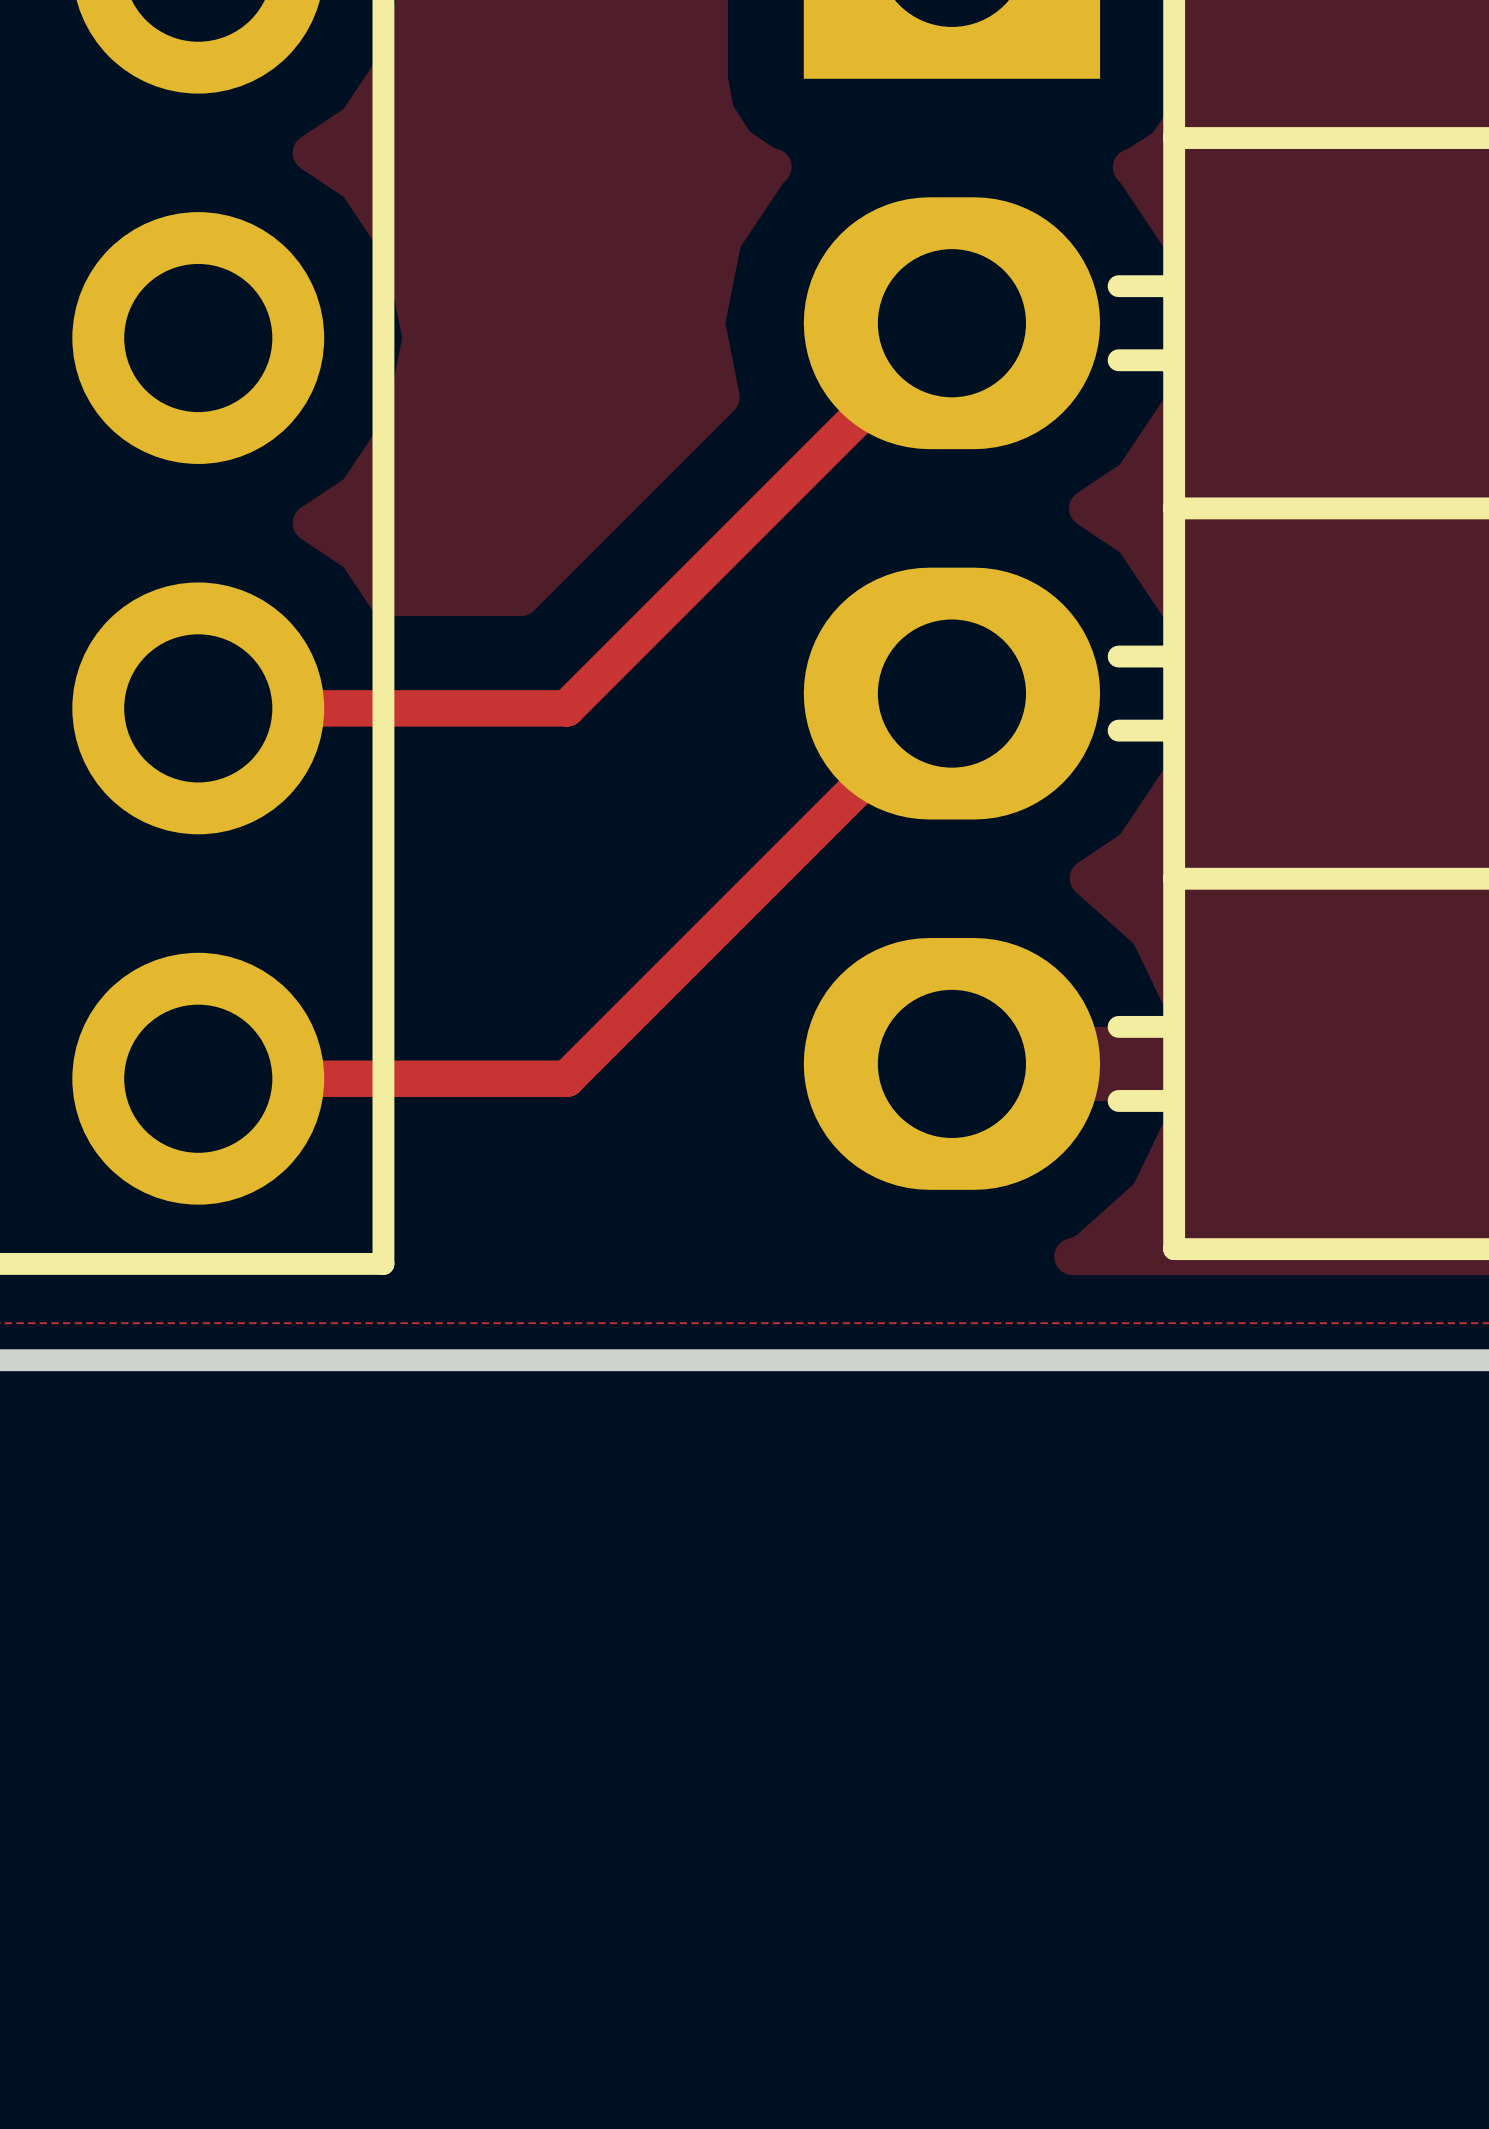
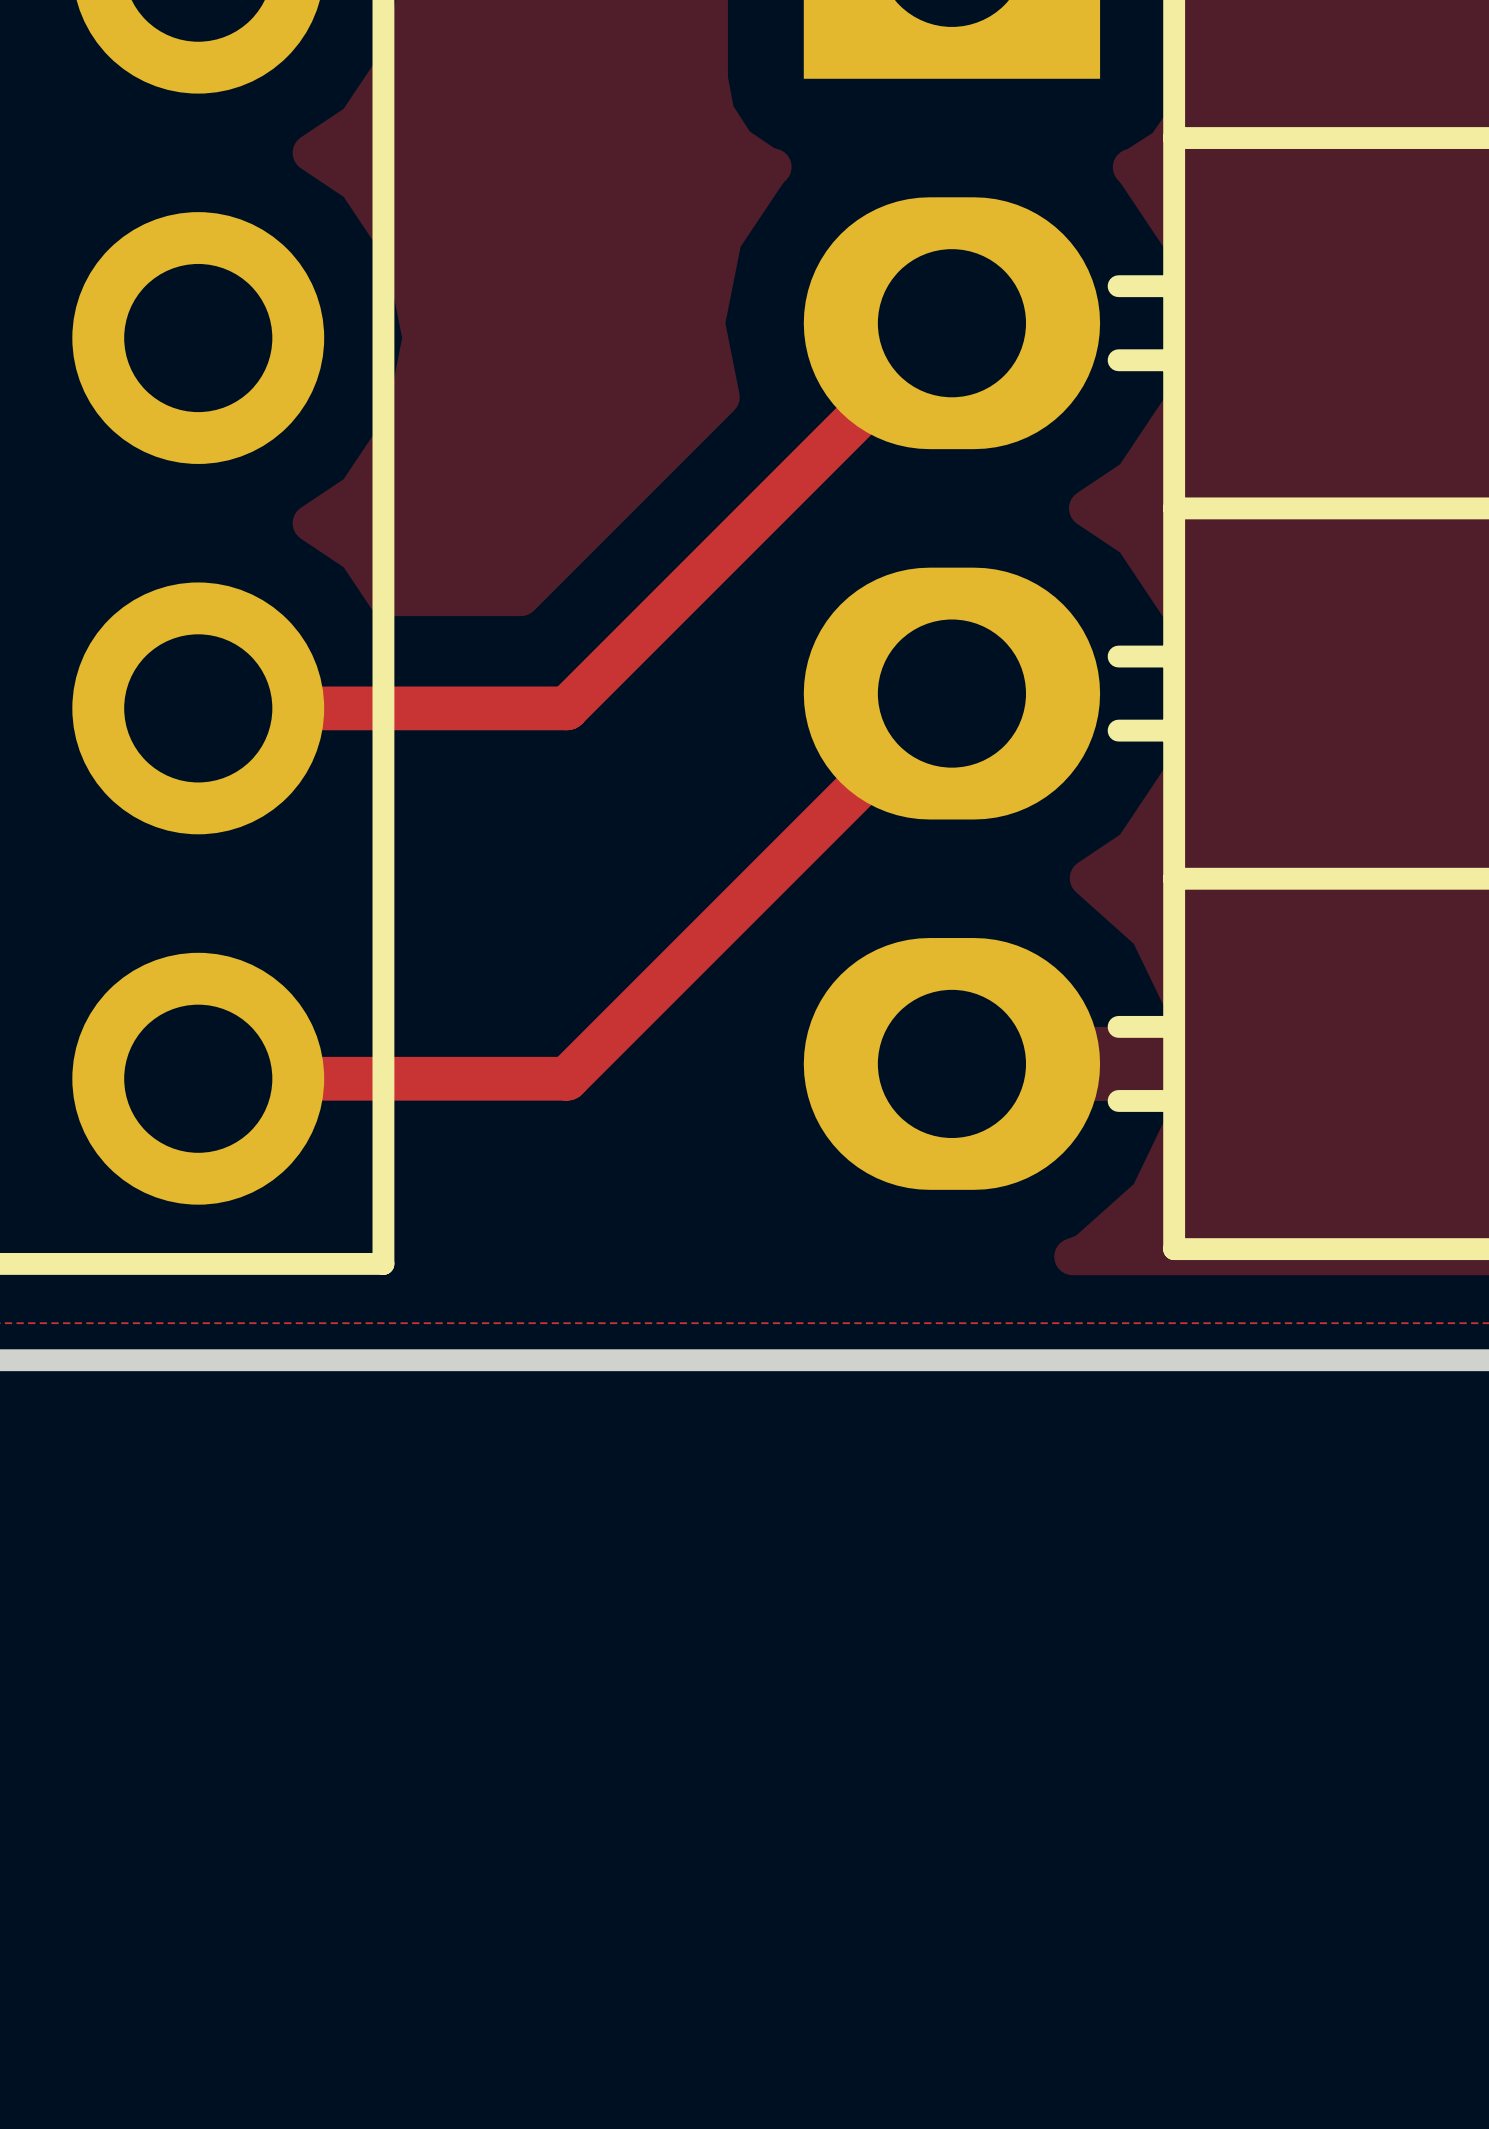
track width: thin (951, 323) (566, 708) (198, 708) -> thick (951, 323) (566, 708) (198, 708)
track width: thin (951, 693) (566, 1078) (198, 1078) -> thick (951, 693) (566, 1078) (198, 1078)

